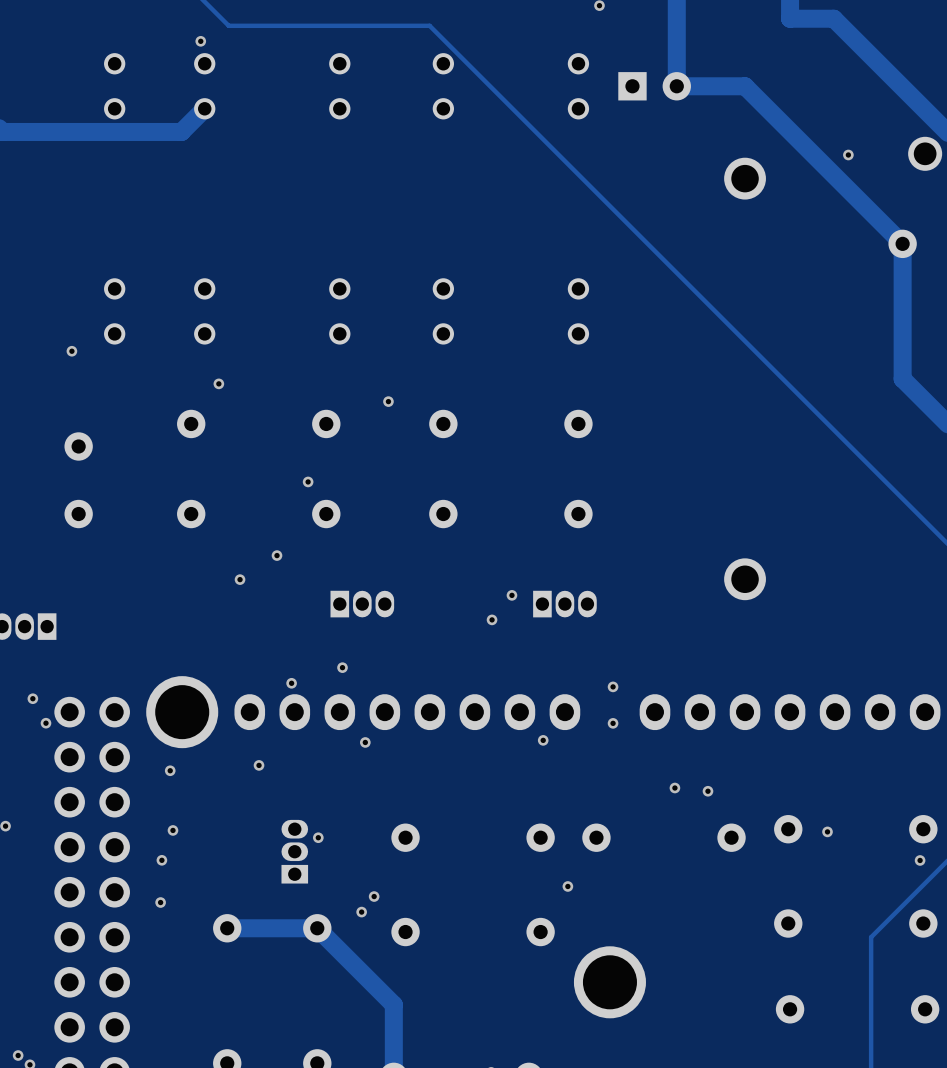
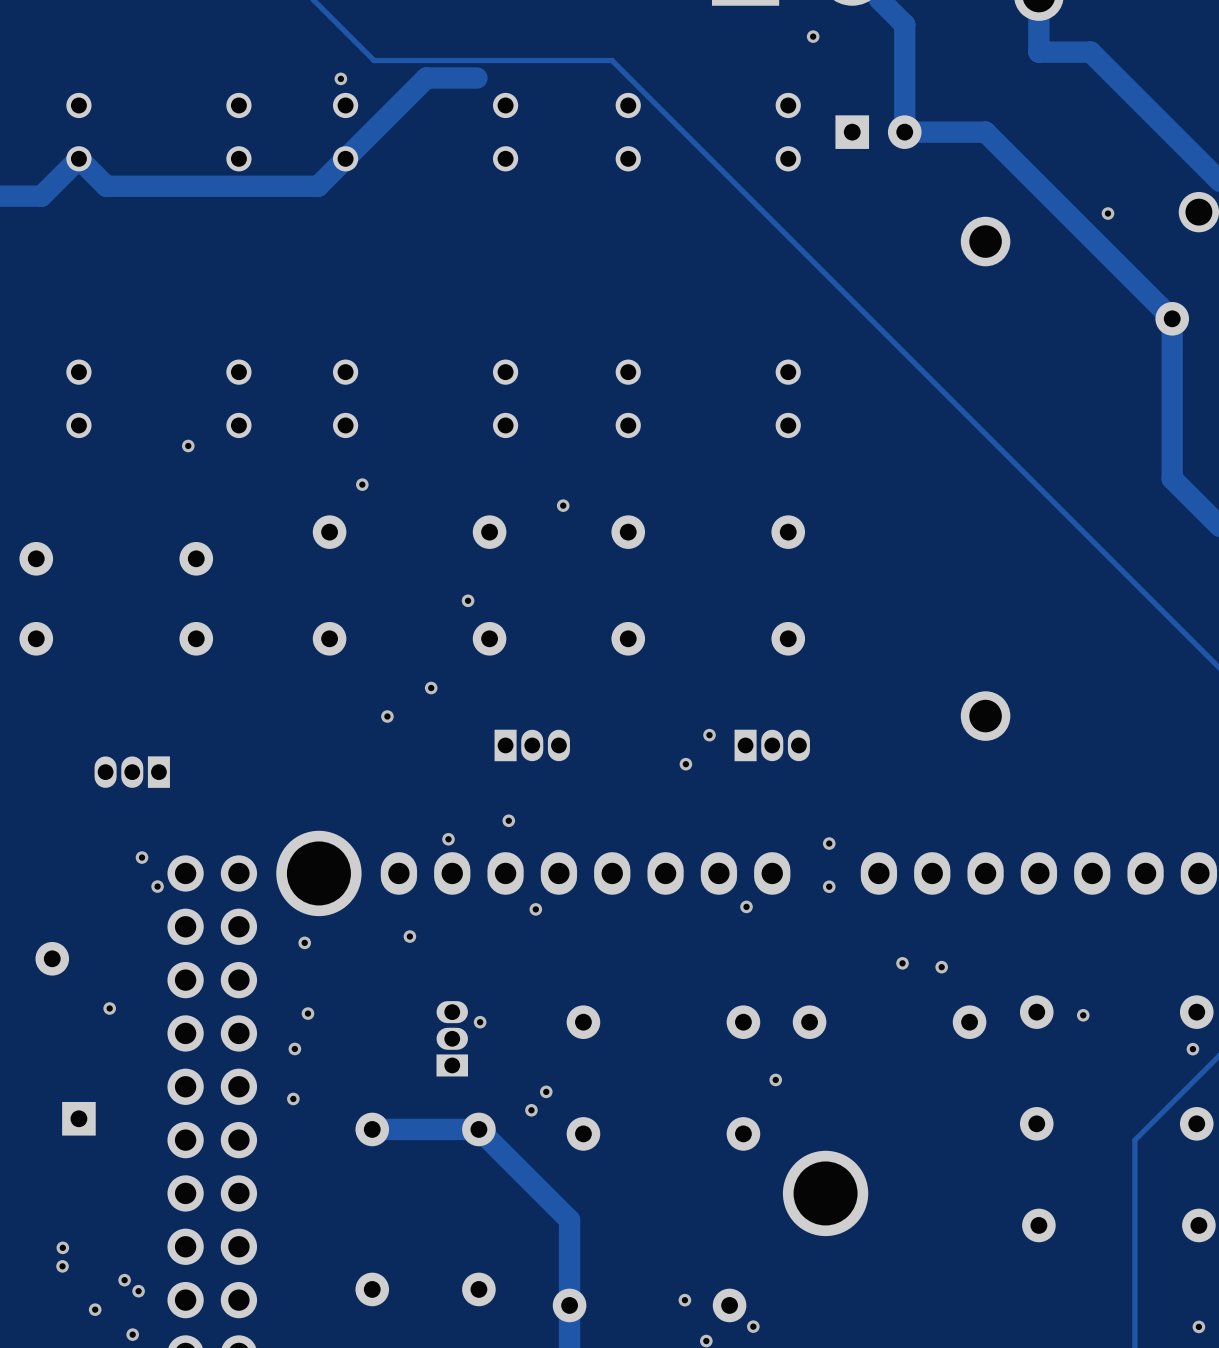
track: none -> (476, 78) (426, 78) (345, 158)

